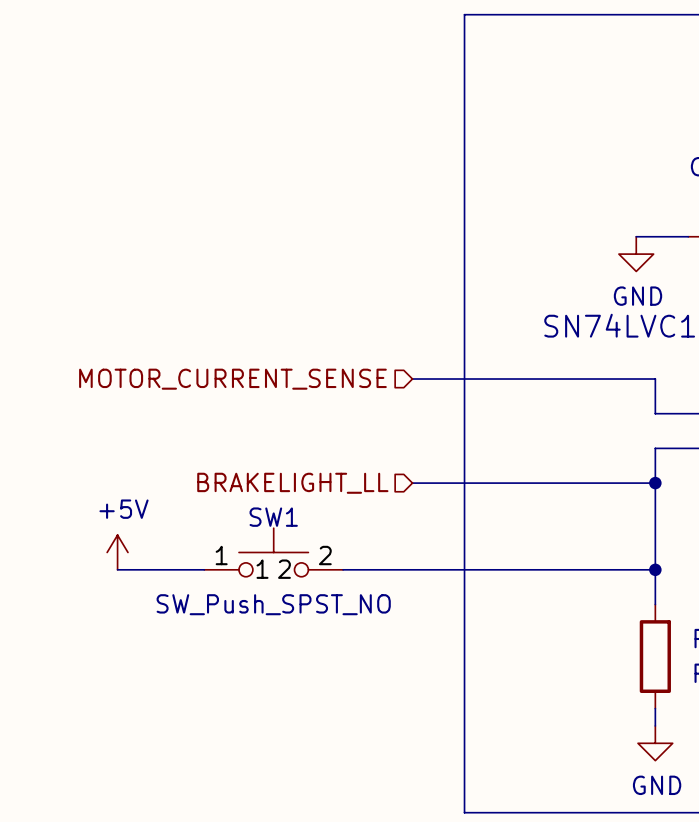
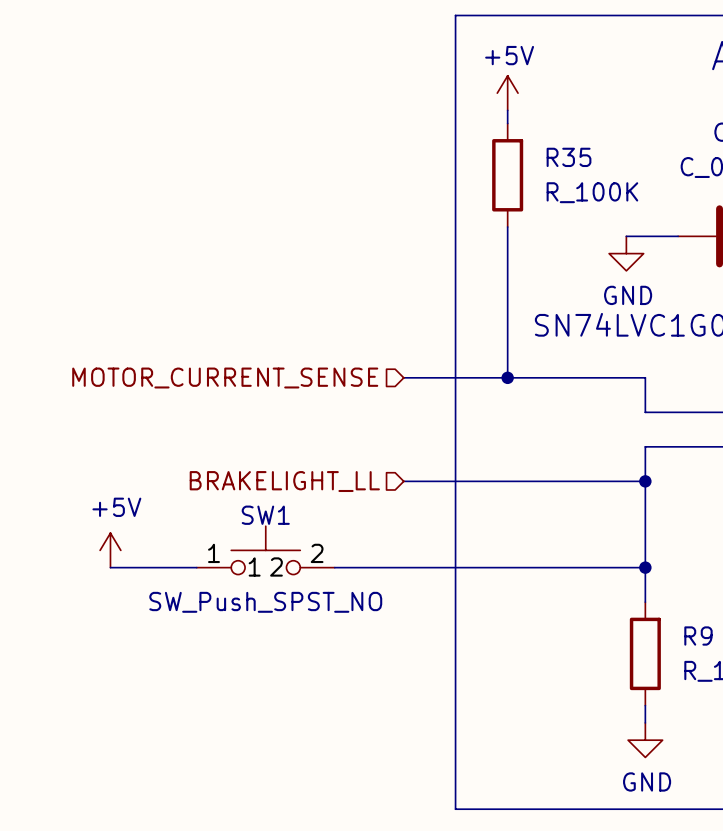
power symbol: none -> +5V (507, 93)
wire: none -> (507, 110) (507, 123)
R35: none -> R_100K (507, 175)
wire: none -> (507, 227) (507, 377)
junction: none -> (507, 377)

